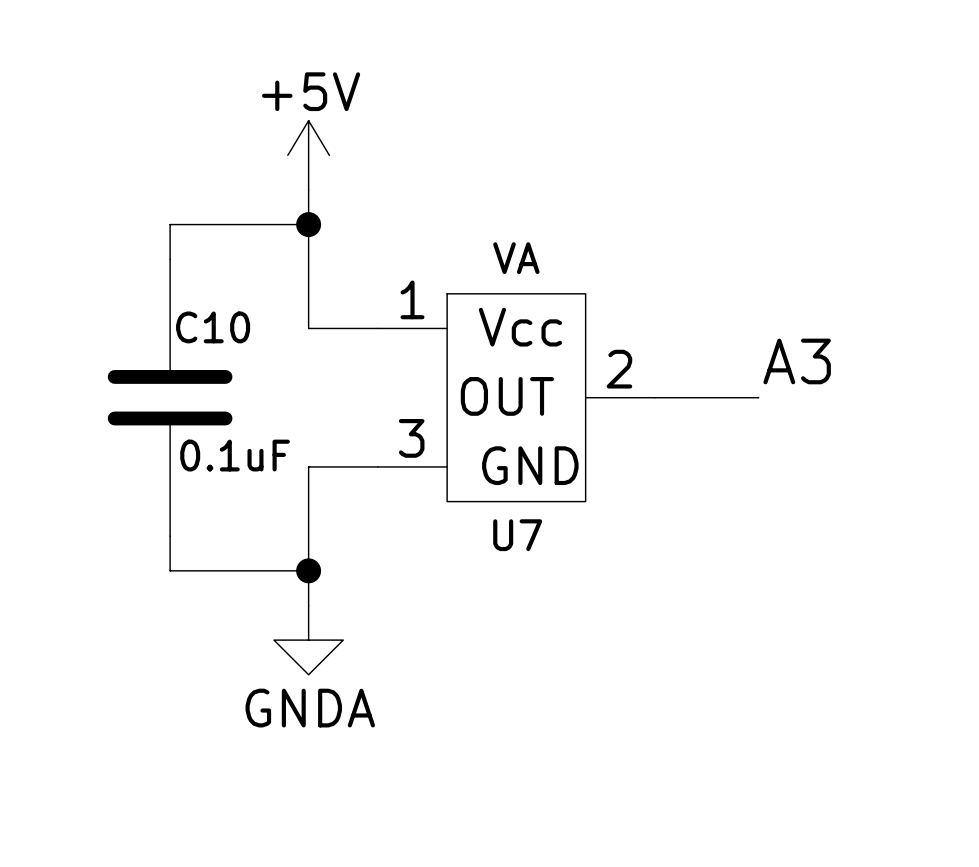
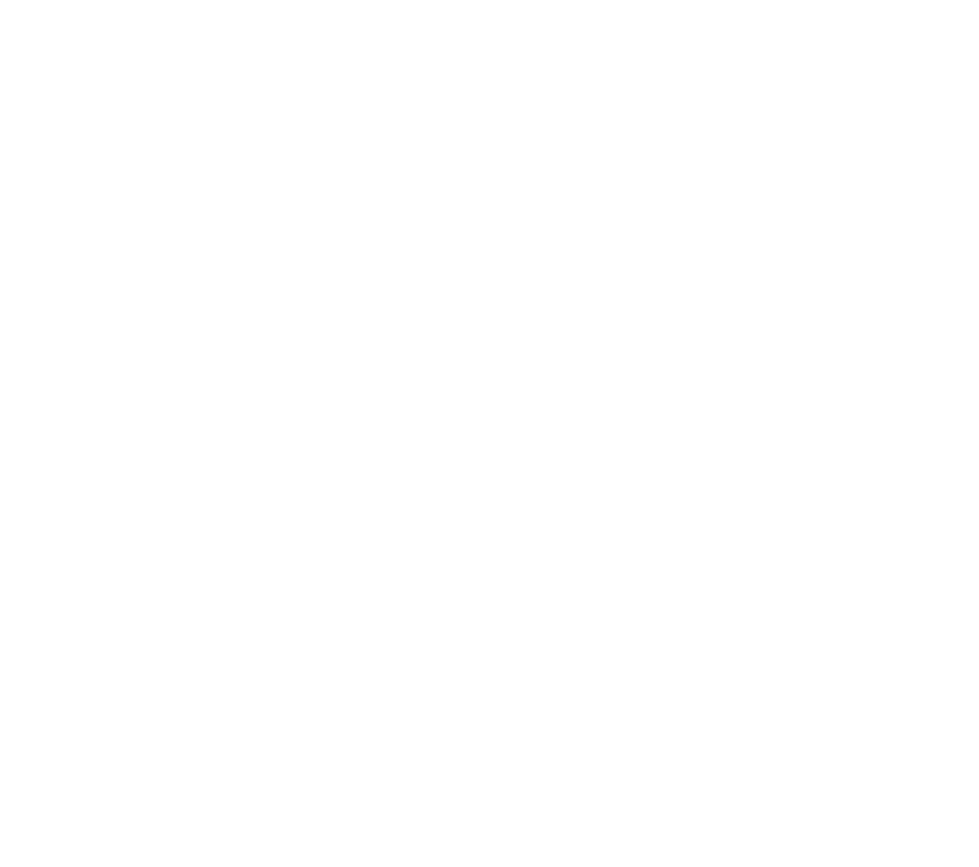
power symbol: +5V (308, 155) -> none
wire: (308, 189) (308, 328) (377, 328) -> none
wire: (308, 224) (170, 224) (170, 259) -> none
junction: (308, 224) -> none
label: A3 (797, 361) -> none
C10: 0.1uF (170, 397) -> none
U7: VA (516, 397) -> none
wire: (654, 397) (758, 397) -> none
wire: (377, 466) (308, 466) (308, 605) -> none
wire: (170, 536) (170, 570) (308, 570) -> none
junction: (308, 570) -> none
power symbol: GNDA (308, 640) -> none

